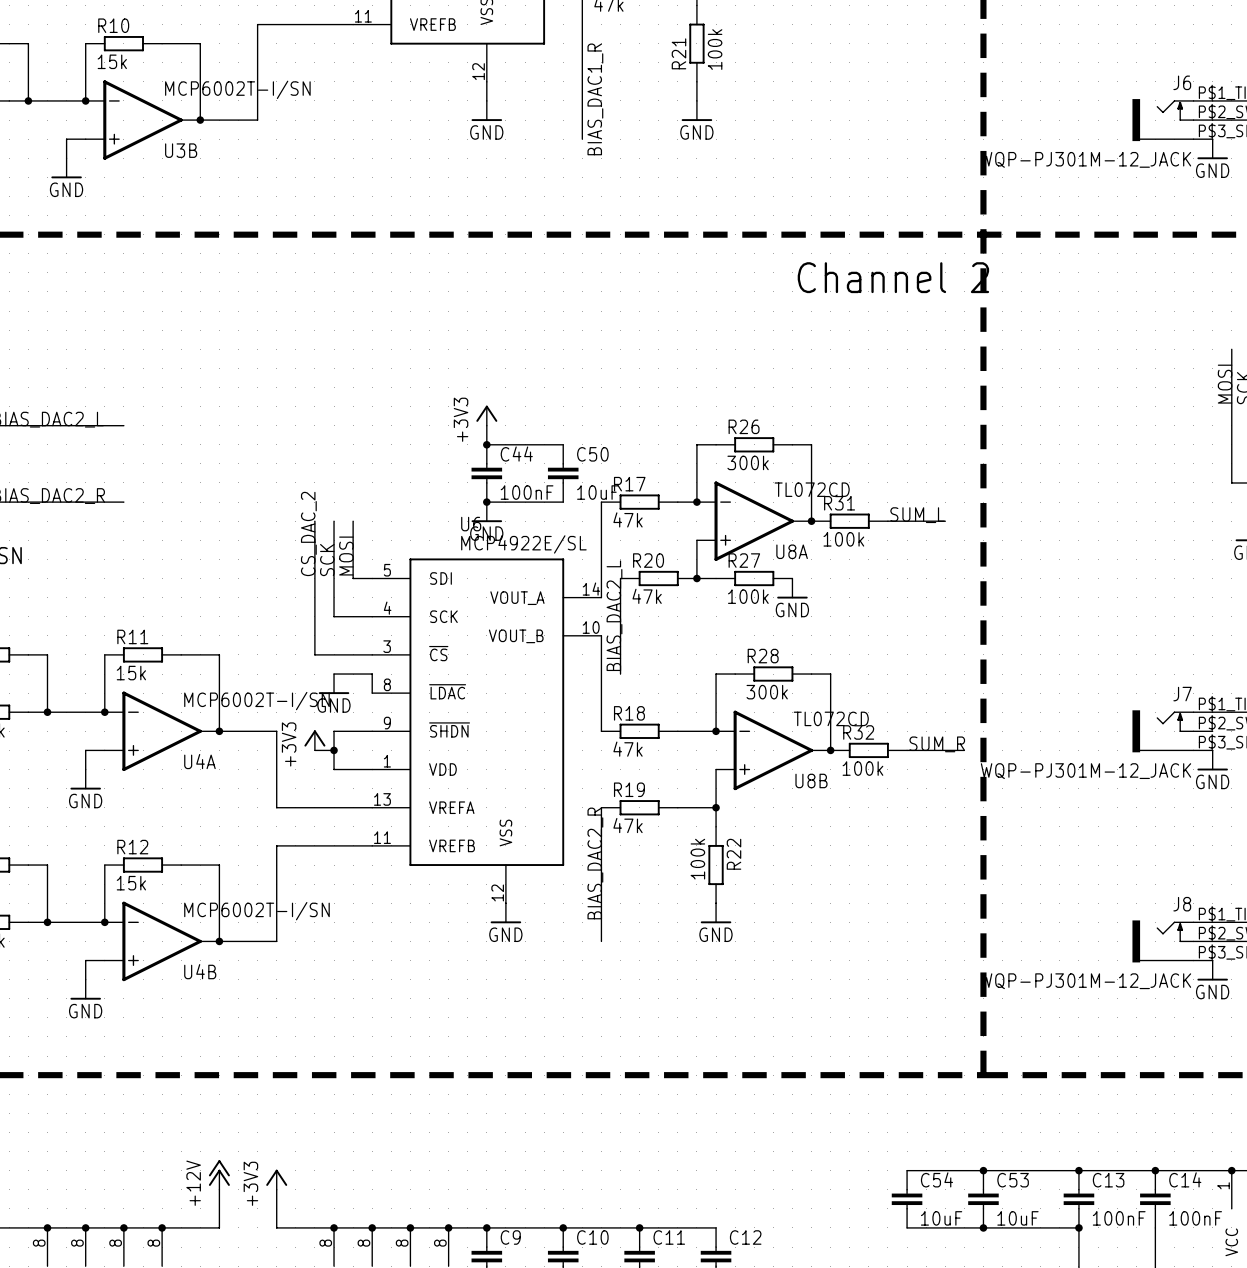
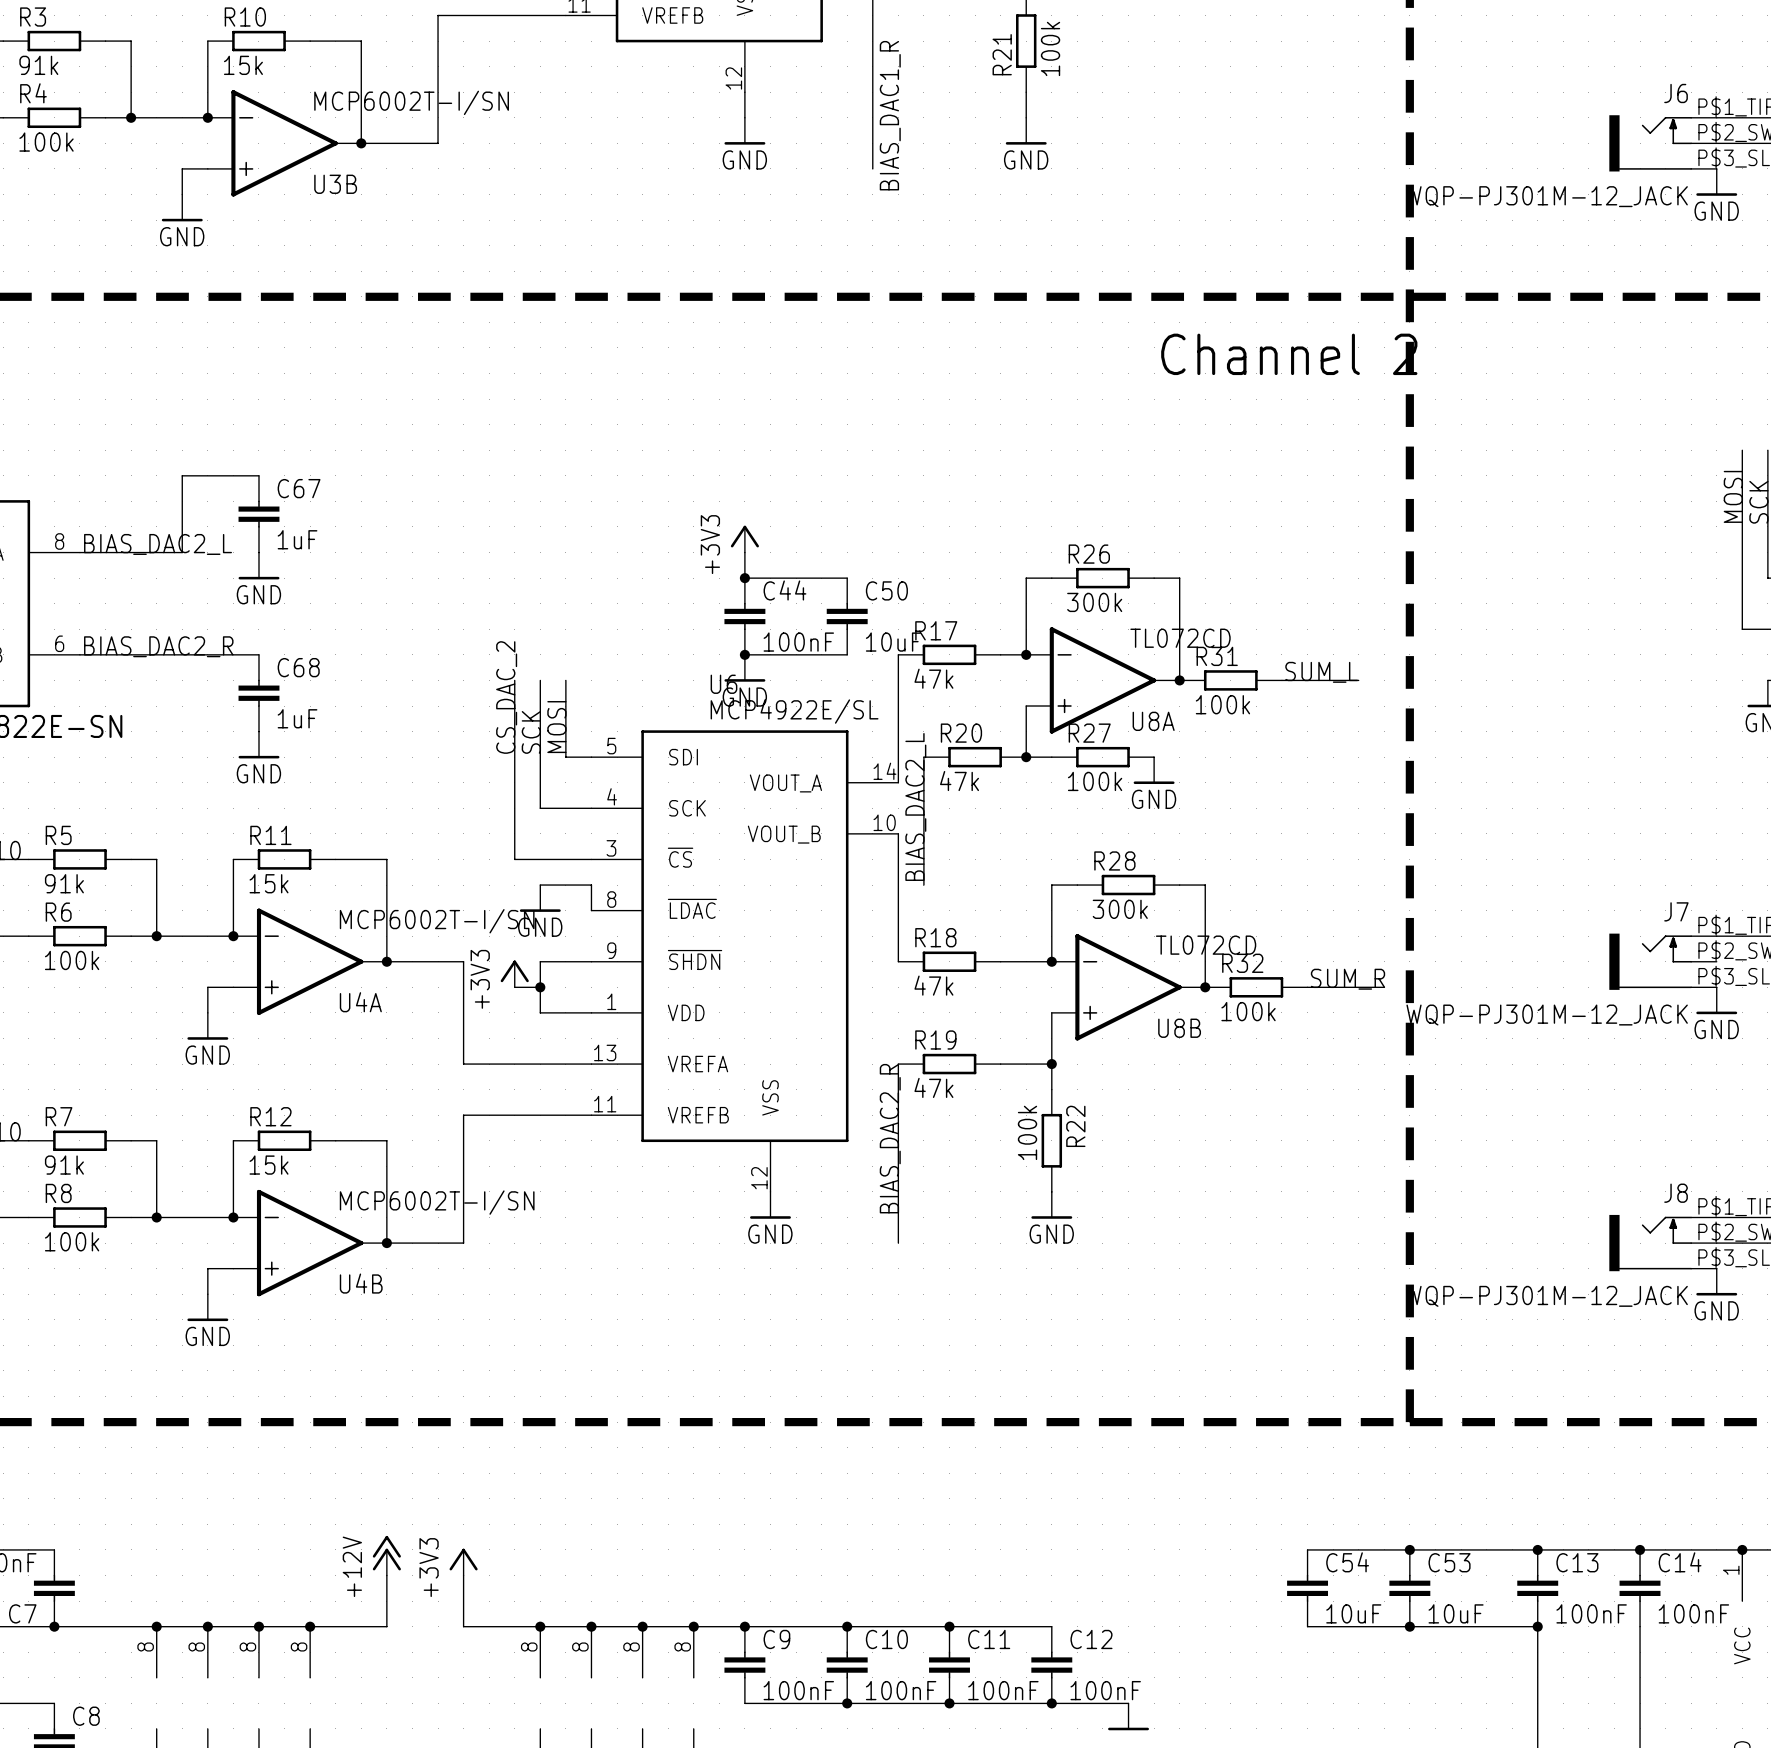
C67: none -> 1uF (258, 514)
wire: (66, 425) (123, 425) -> (182, 552) (182, 475) (258, 475)
power symbol: none -> GND (258, 565)
C68: none -> 1uF (258, 693)
power symbol: none -> GND (258, 745)

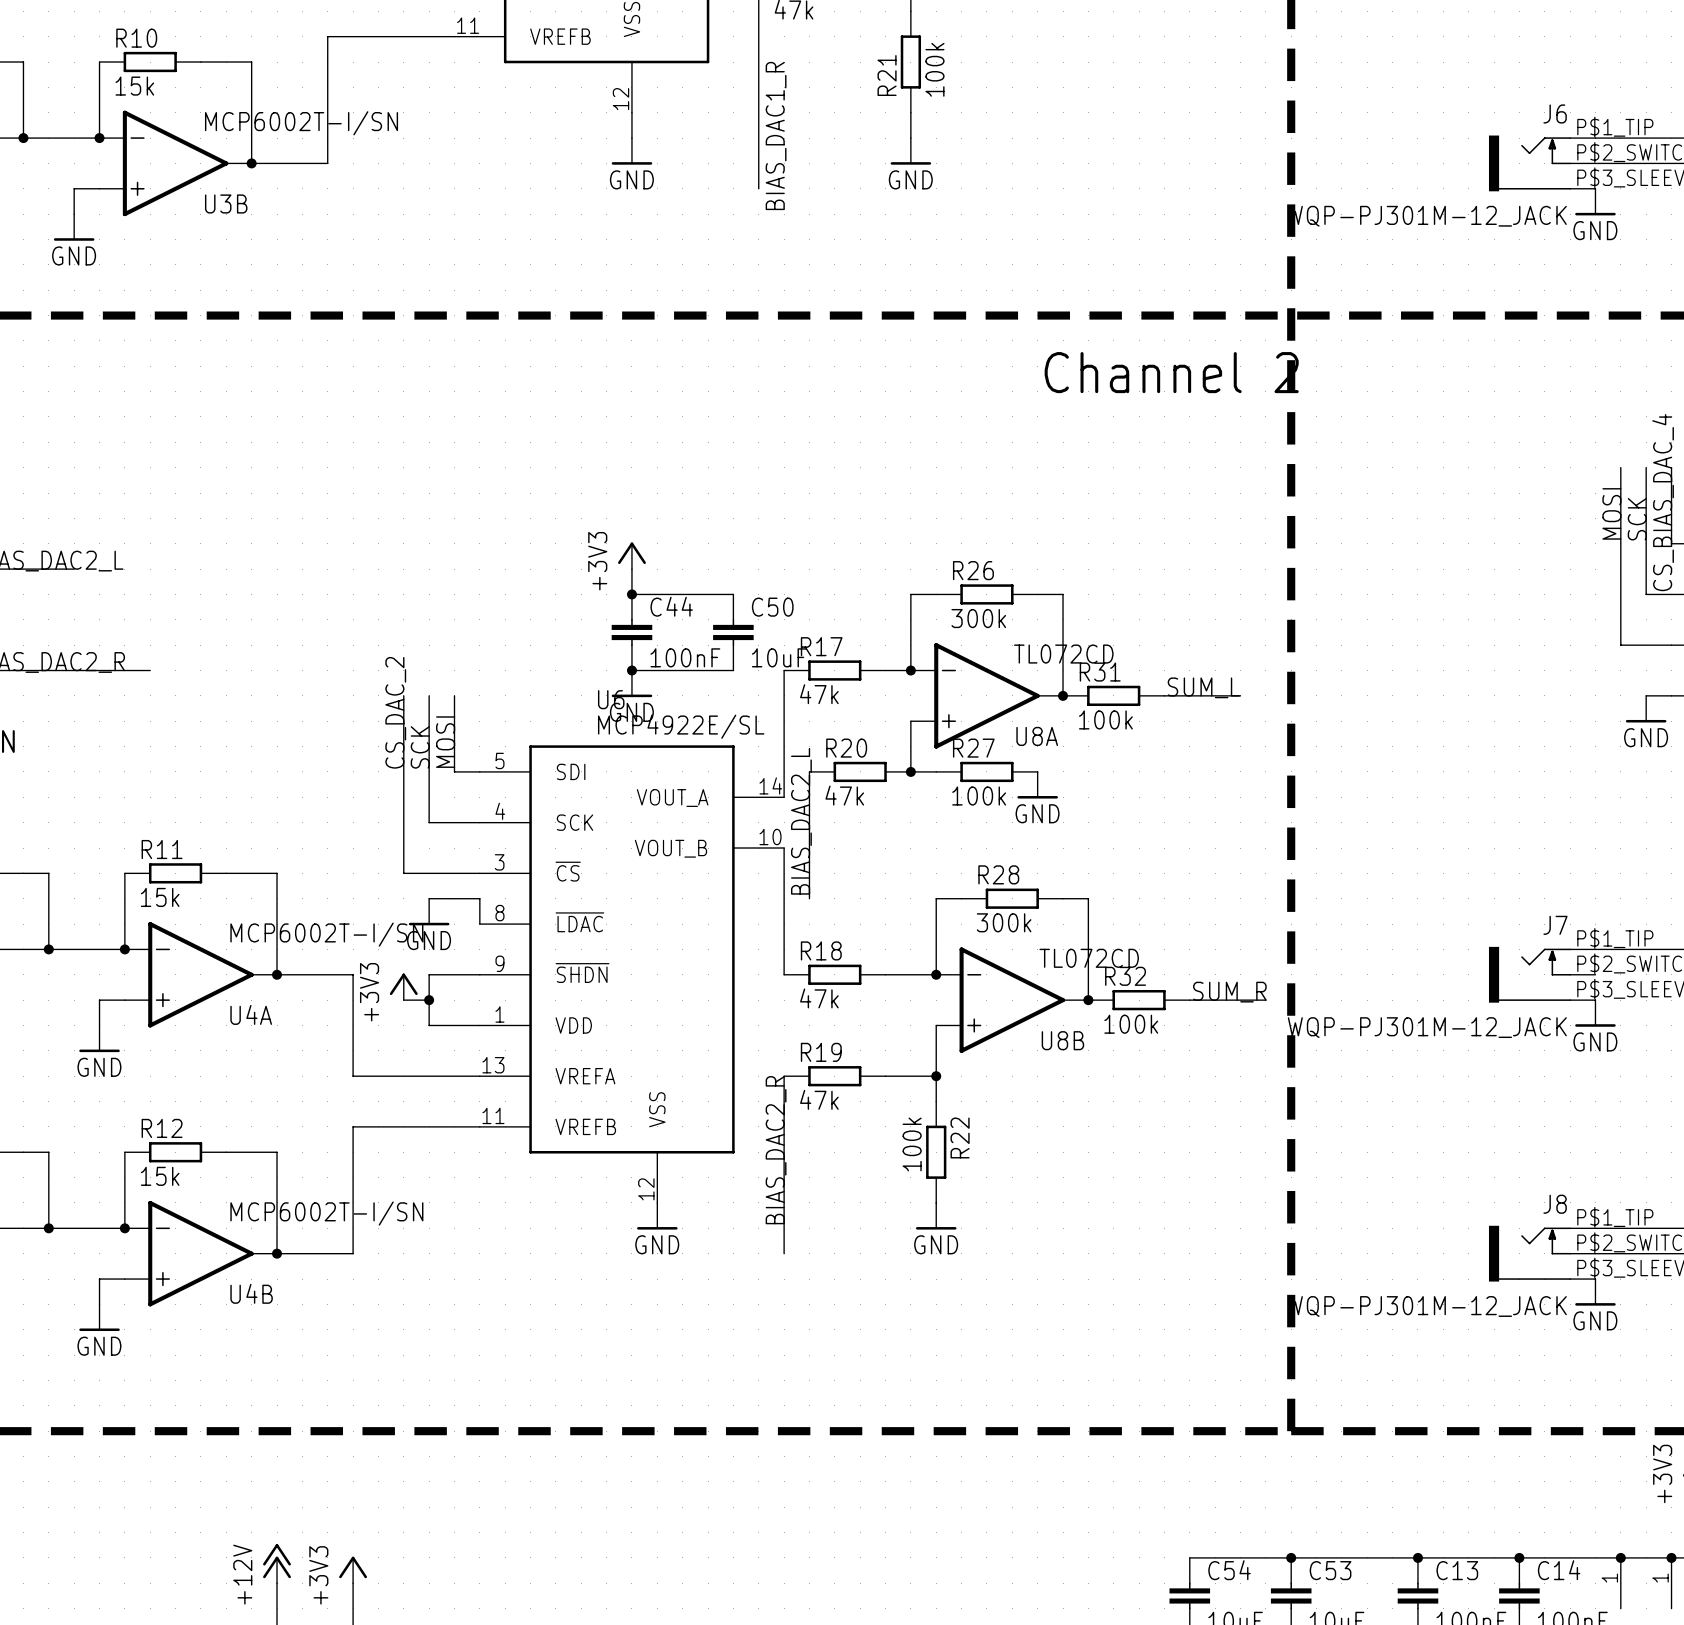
wire: (258, 475) (182, 475) (182, 552) -> none
C67: 1uF (258, 514) -> none
power symbol: GND (258, 565) -> none
C68: 1uF (258, 693) -> none
power symbol: GND (258, 745) -> none

